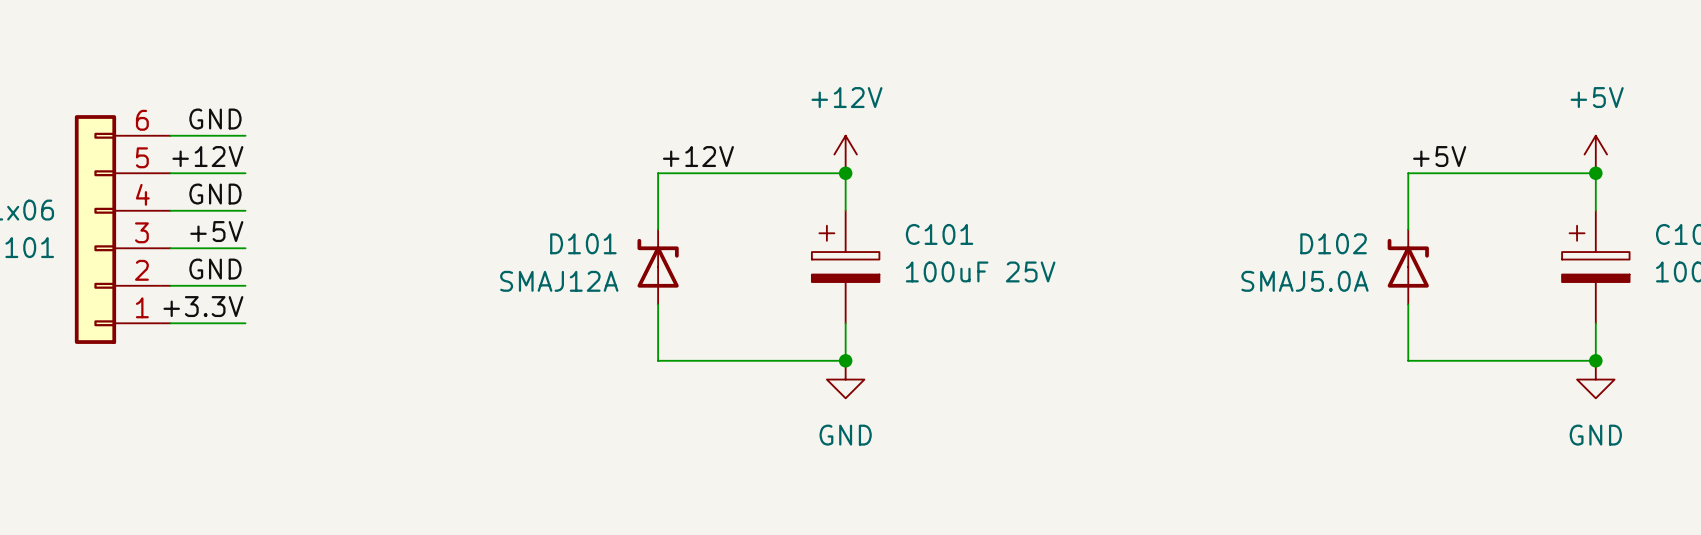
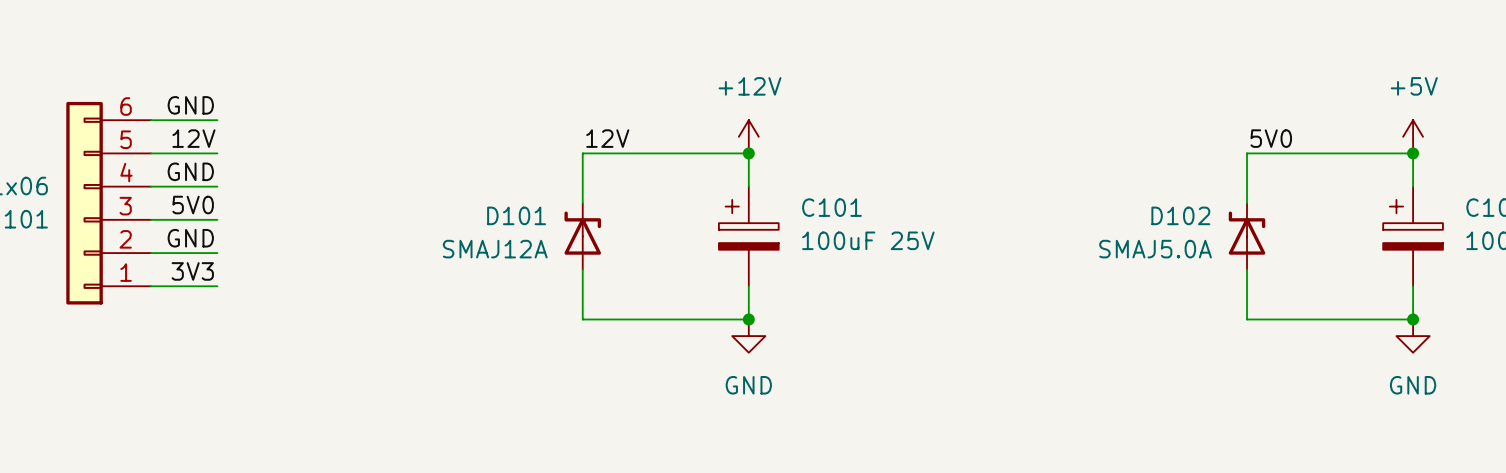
label: +12V (207, 156) -> 12V (193, 138)
label: +12V (698, 156) -> 12V (607, 138)
label: +5V (1439, 156) -> 5V0 (1271, 138)
label: +5V (216, 231) -> 5V0 (193, 205)
label: +3.3V (203, 306) -> 3V3 (192, 271)

